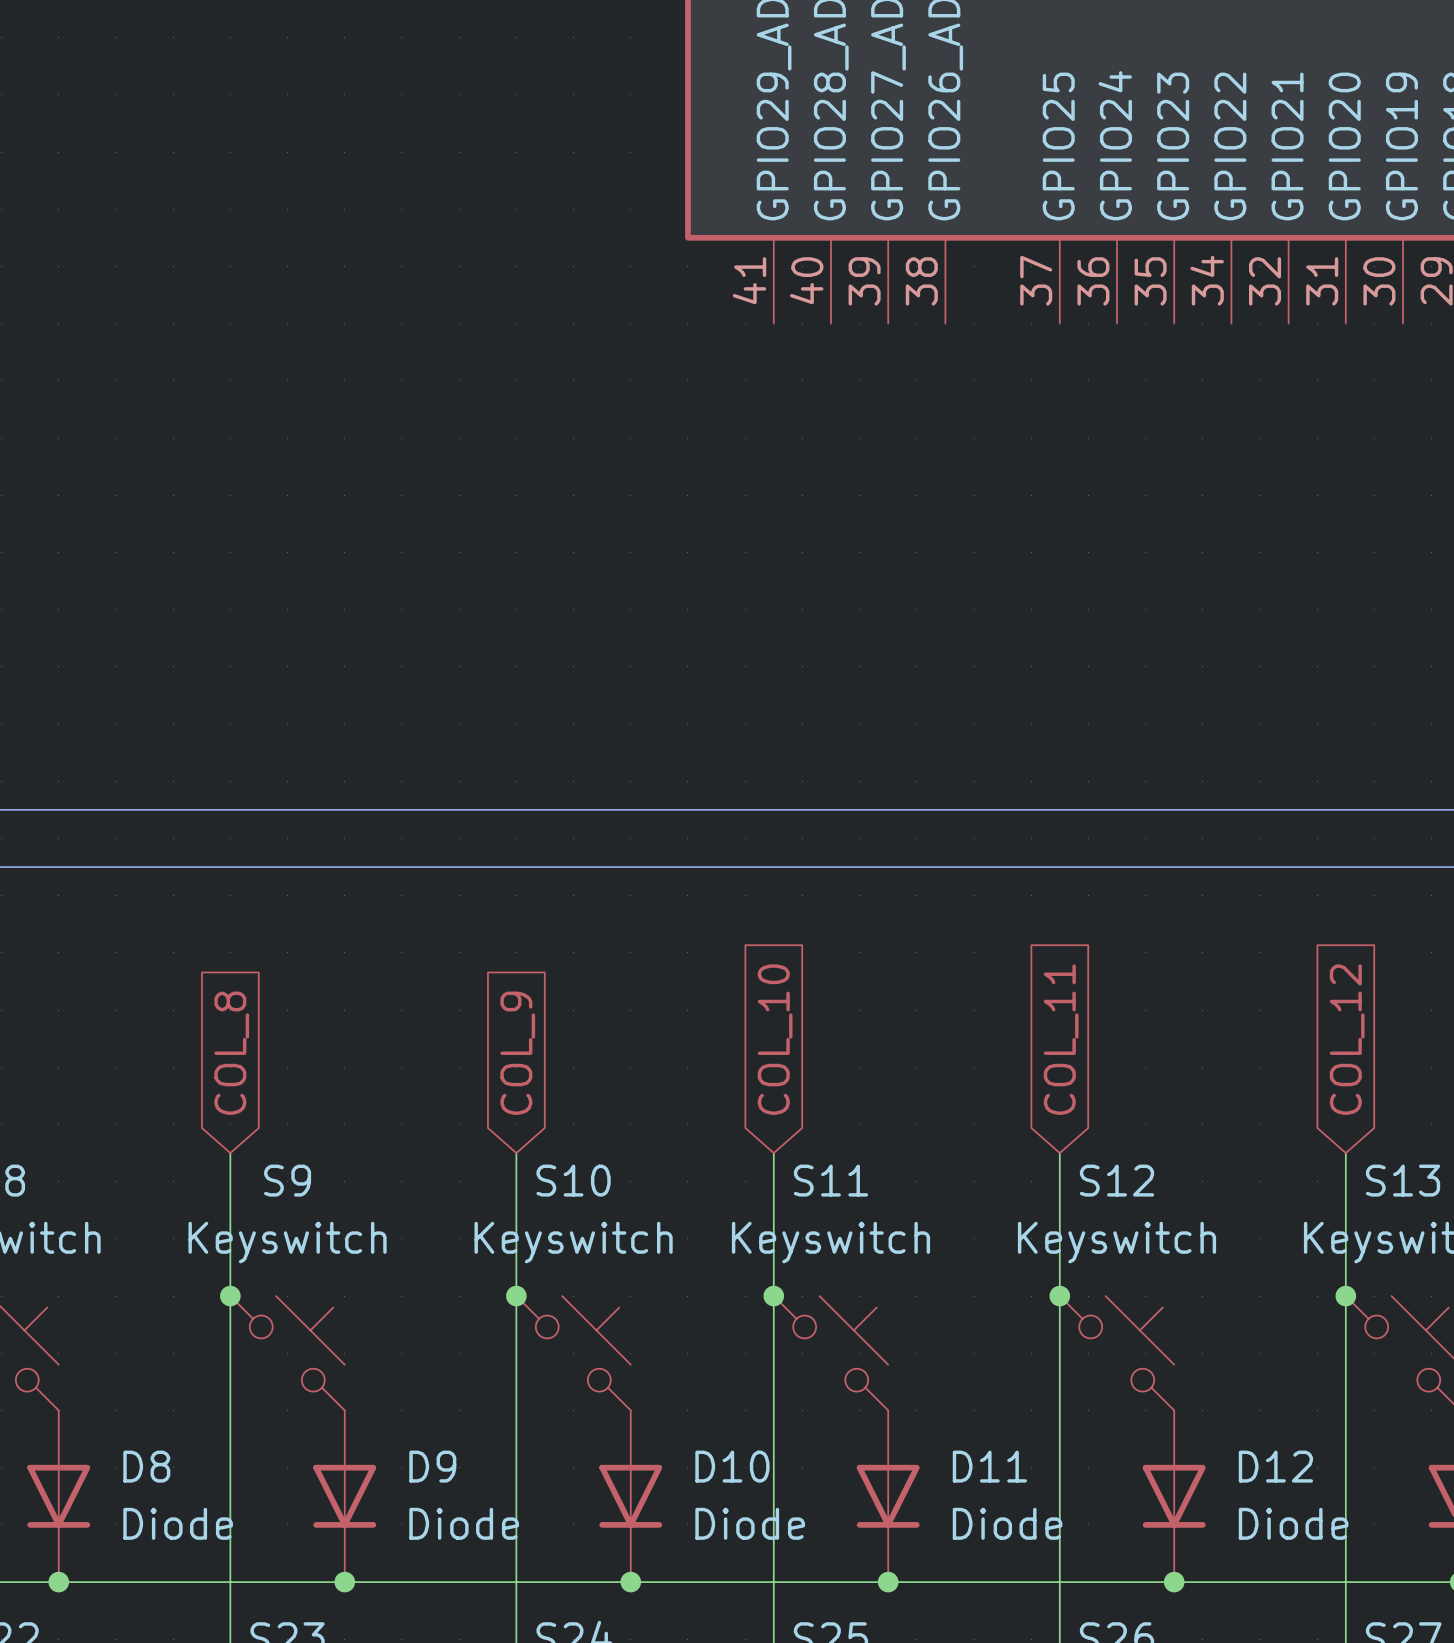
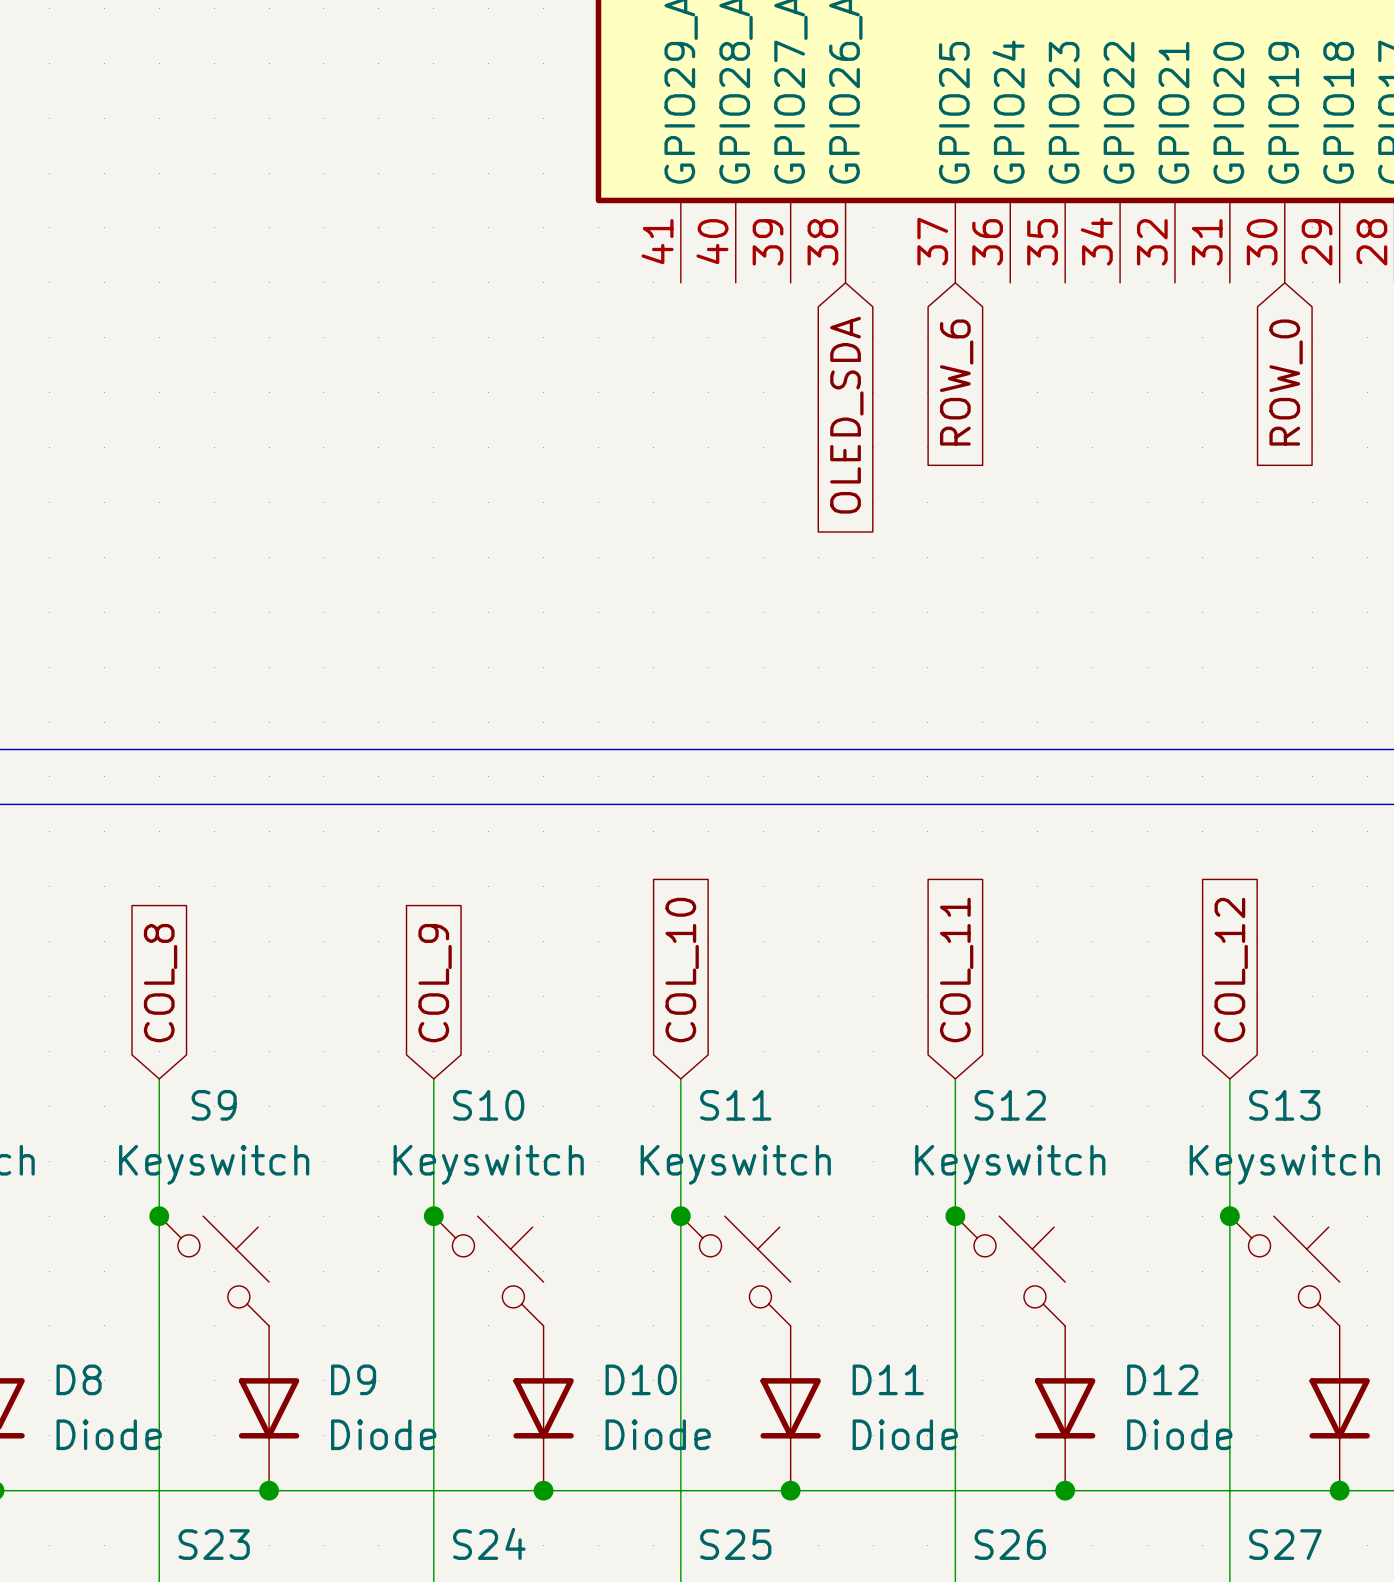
global label: none -> ROW_6 (956, 382)
global label: none -> ROW_0 (1286, 382)
global label: none -> OLED_SDA (846, 415)

